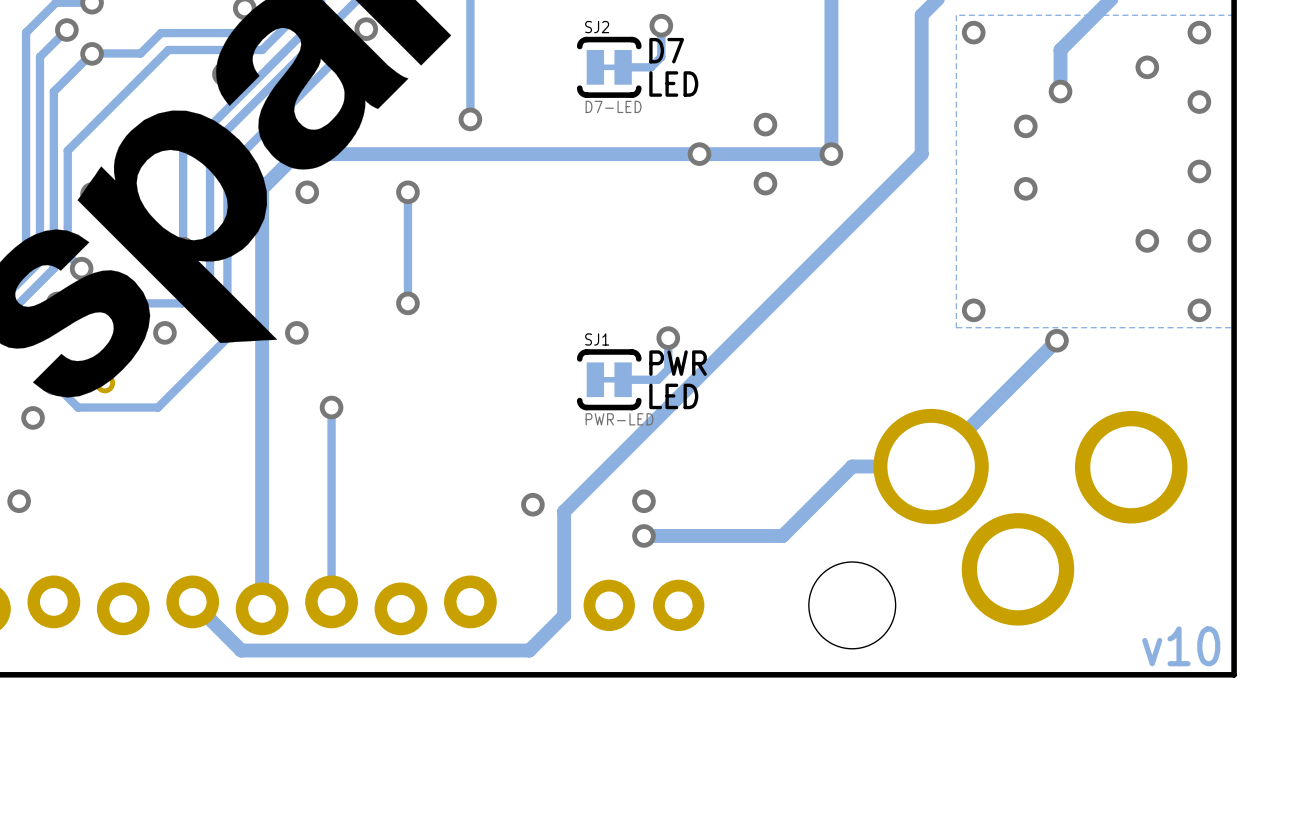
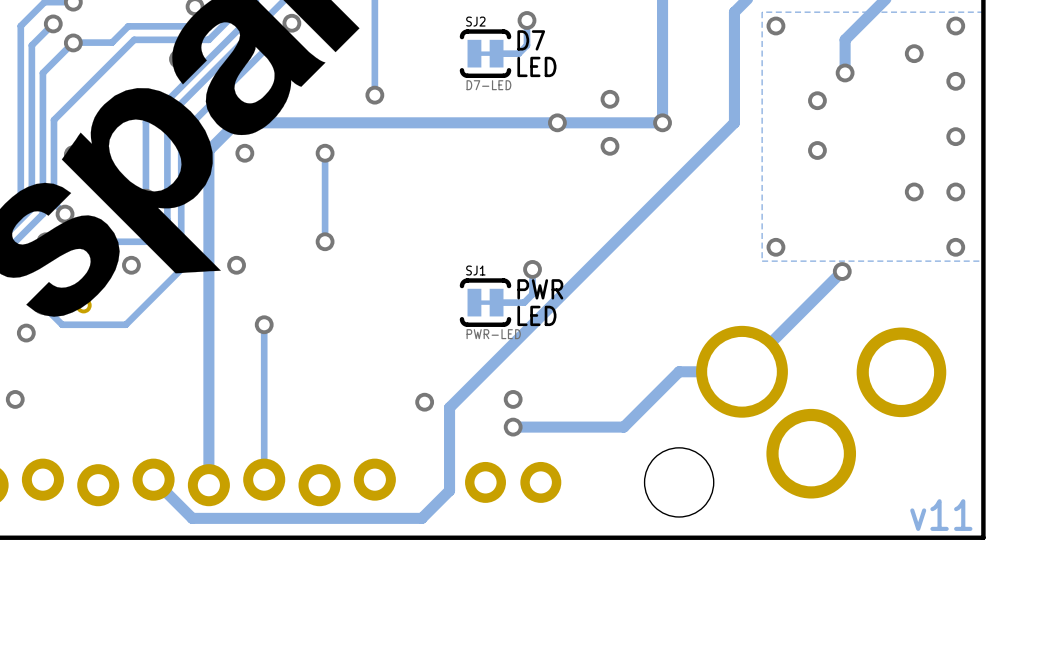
text: v10 (1181, 646) -> v11 (941, 515)

